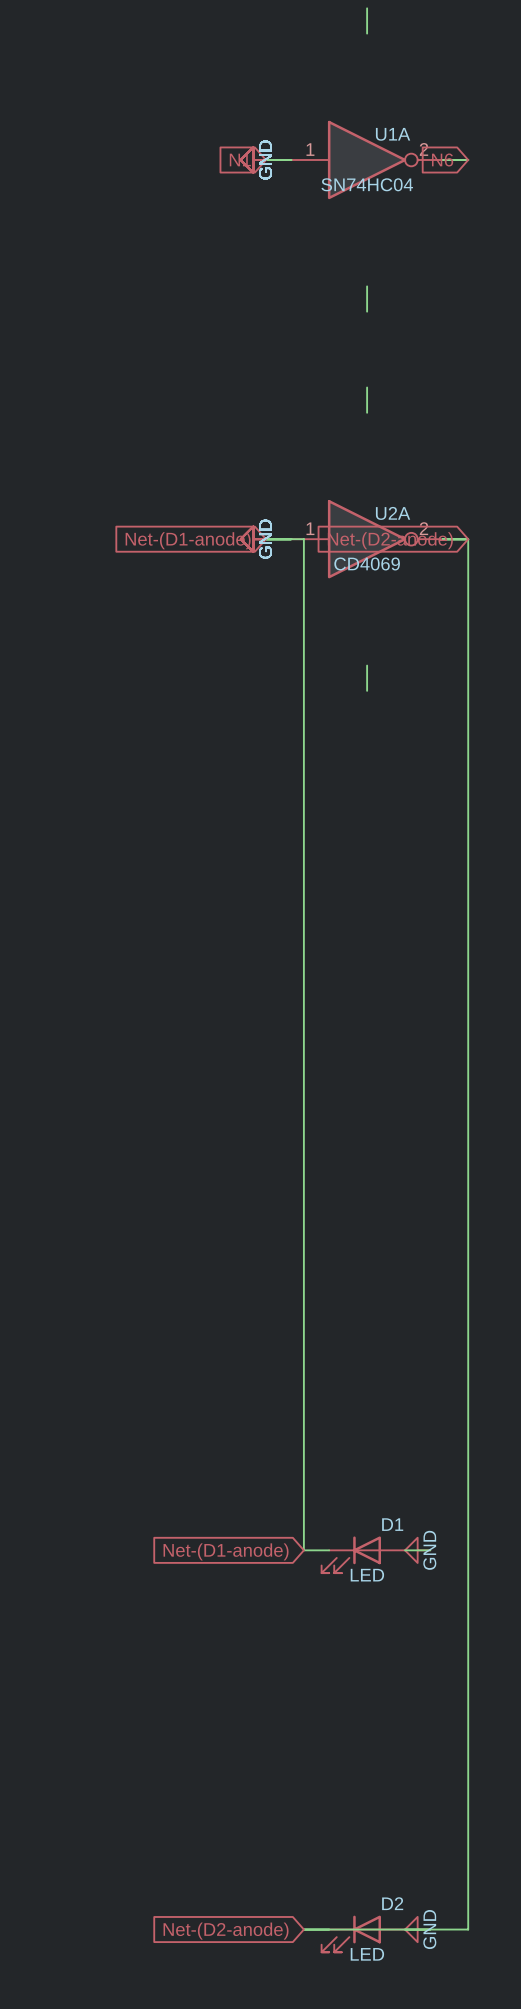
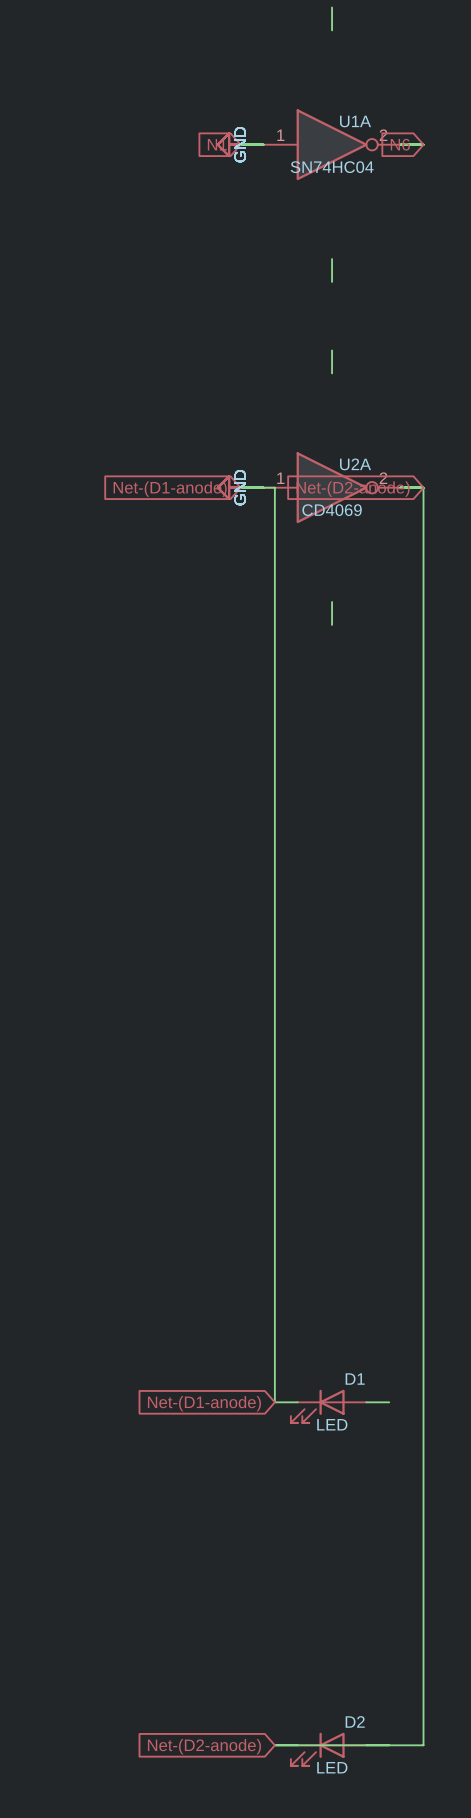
power symbol: GND (417, 1550) -> none
power symbol: GND (417, 1929) -> none

